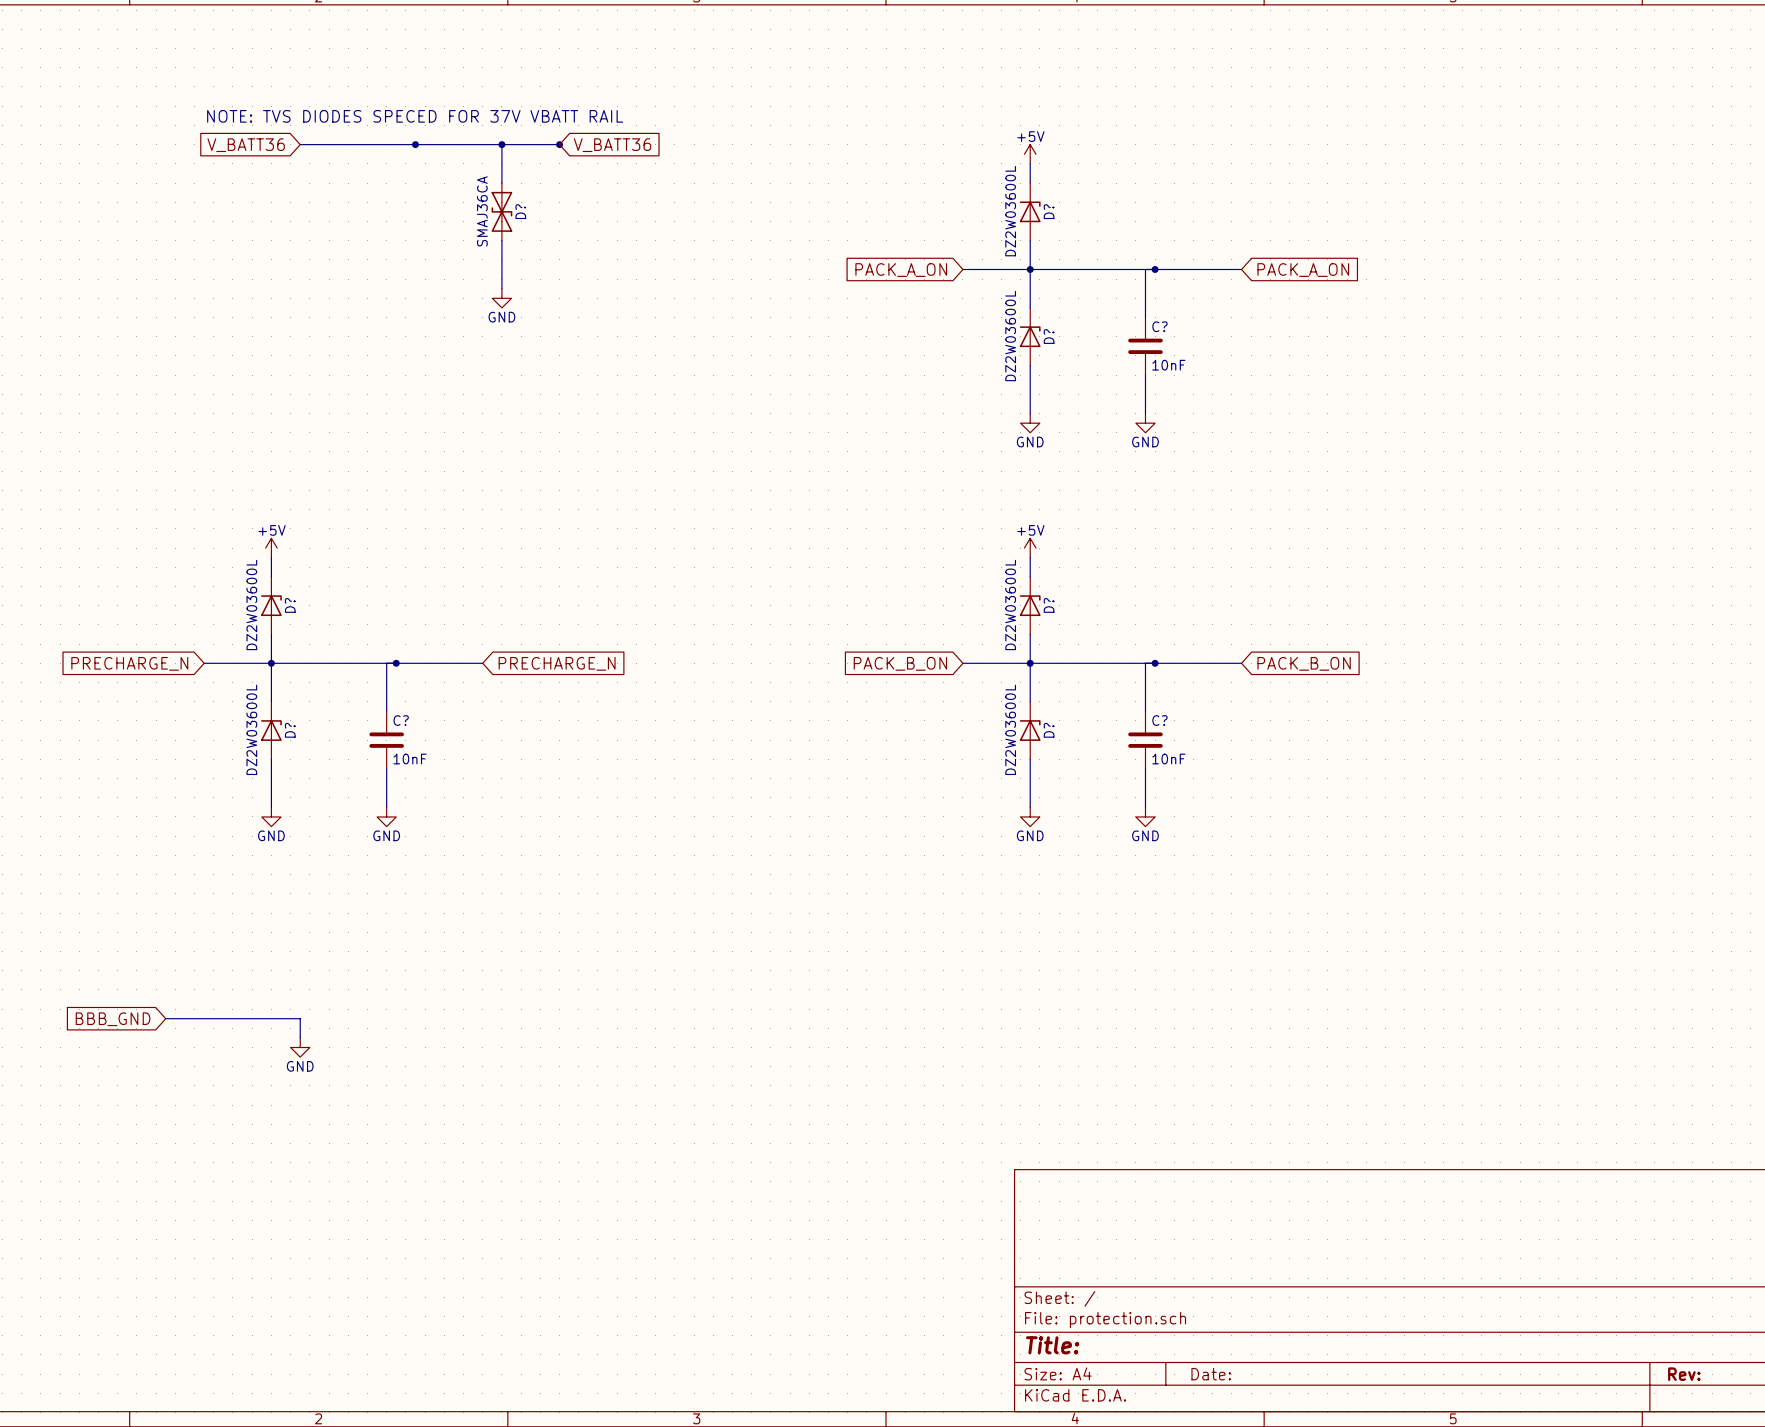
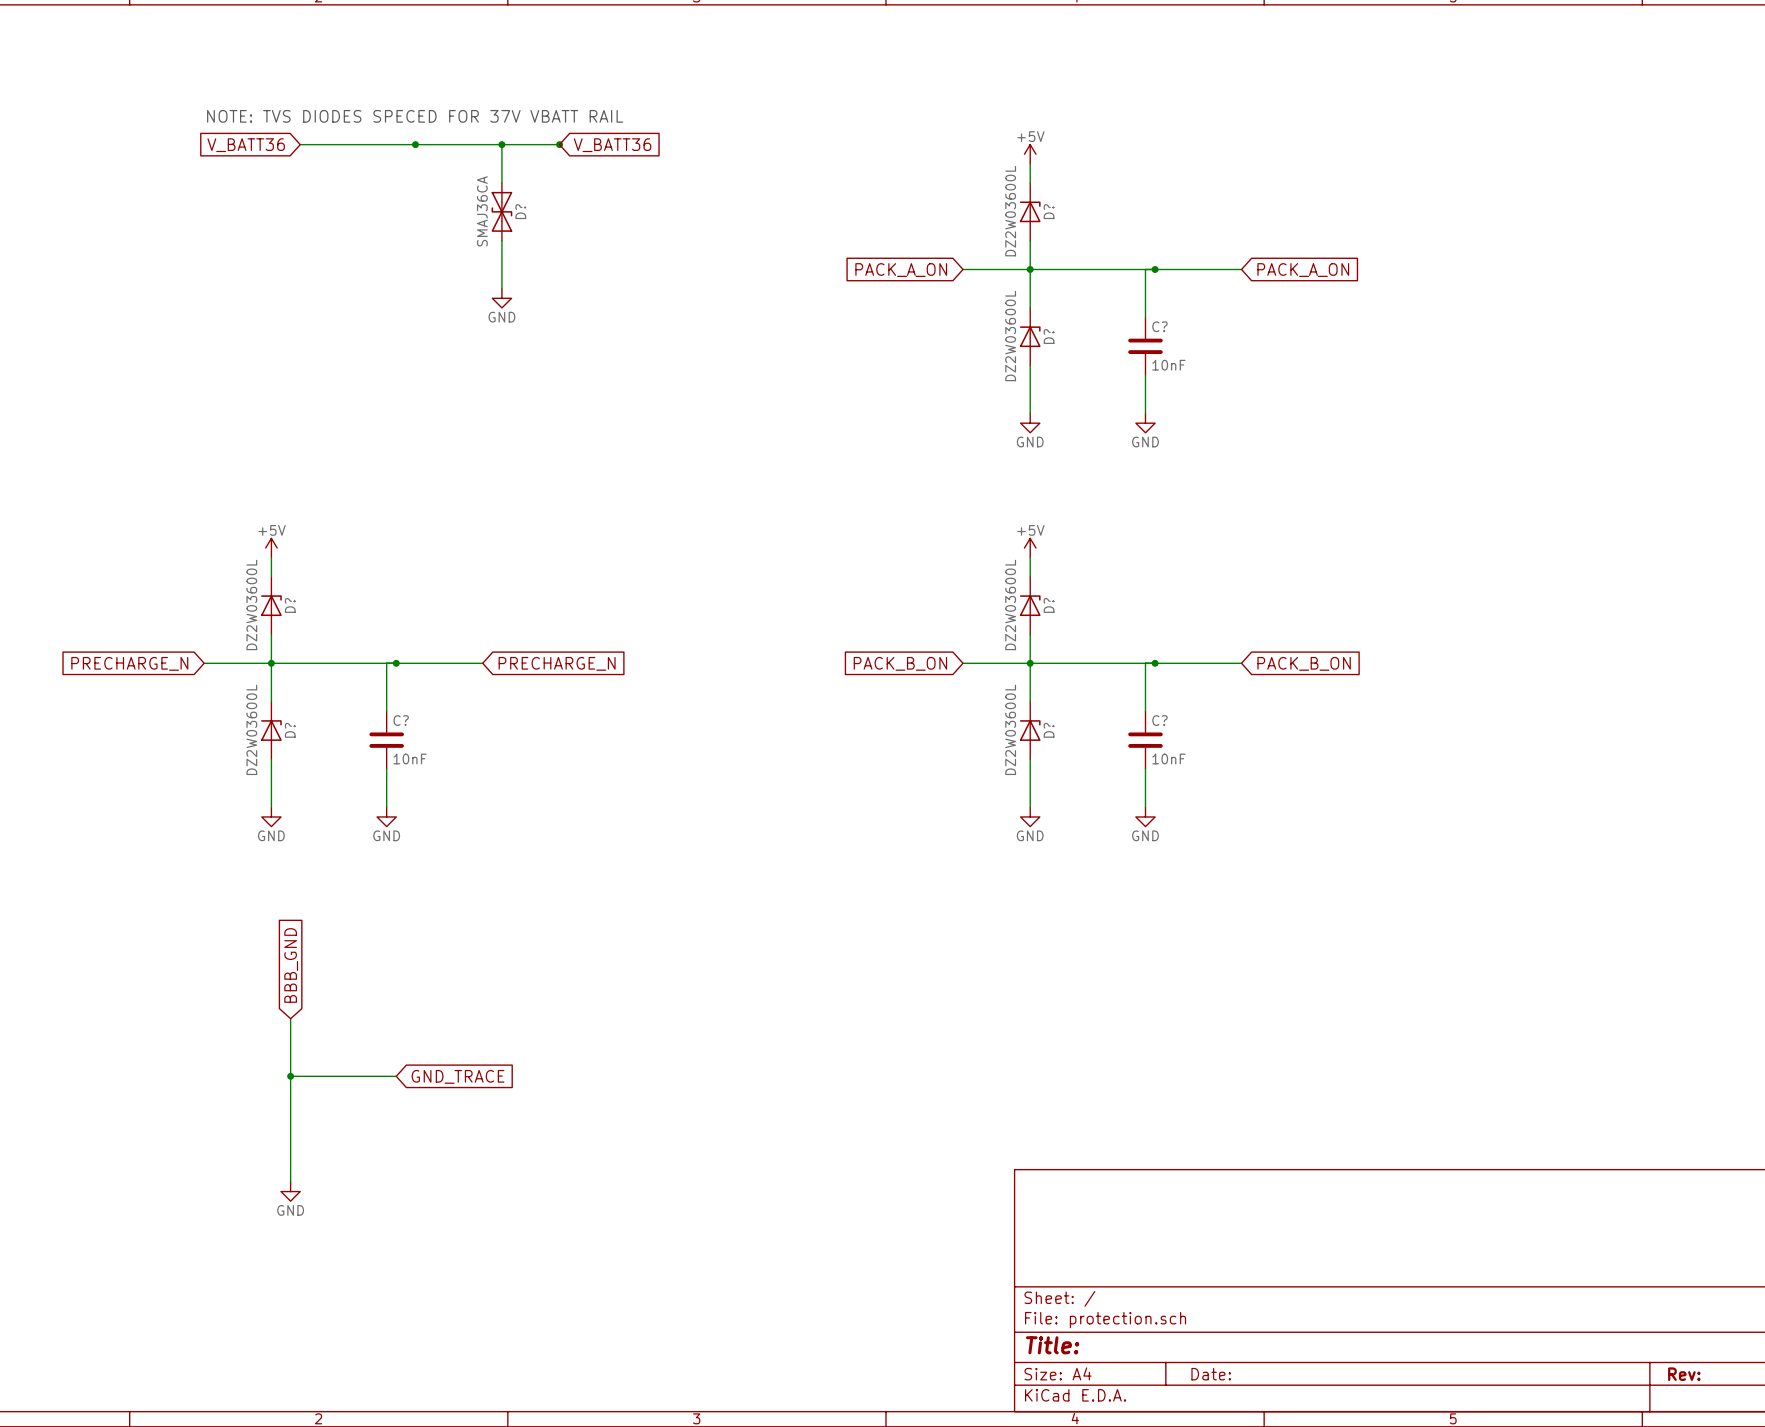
wire: (165, 1018) (300, 1018) (300, 1037) -> none
wire: none -> (290, 1018) (290, 1181)
global label rotation: 0° (113, 1019) -> 90° clockwise (291, 965)
global label position: BBB_GND (113, 1019) -> BBB_GND (291, 965)
power symbol position: GND (300, 1047) -> GND (290, 1191)
wire: none -> (290, 1076) (396, 1076)
junction: none -> (290, 1076)
global label: none -> GND_TRACE (458, 1076)

